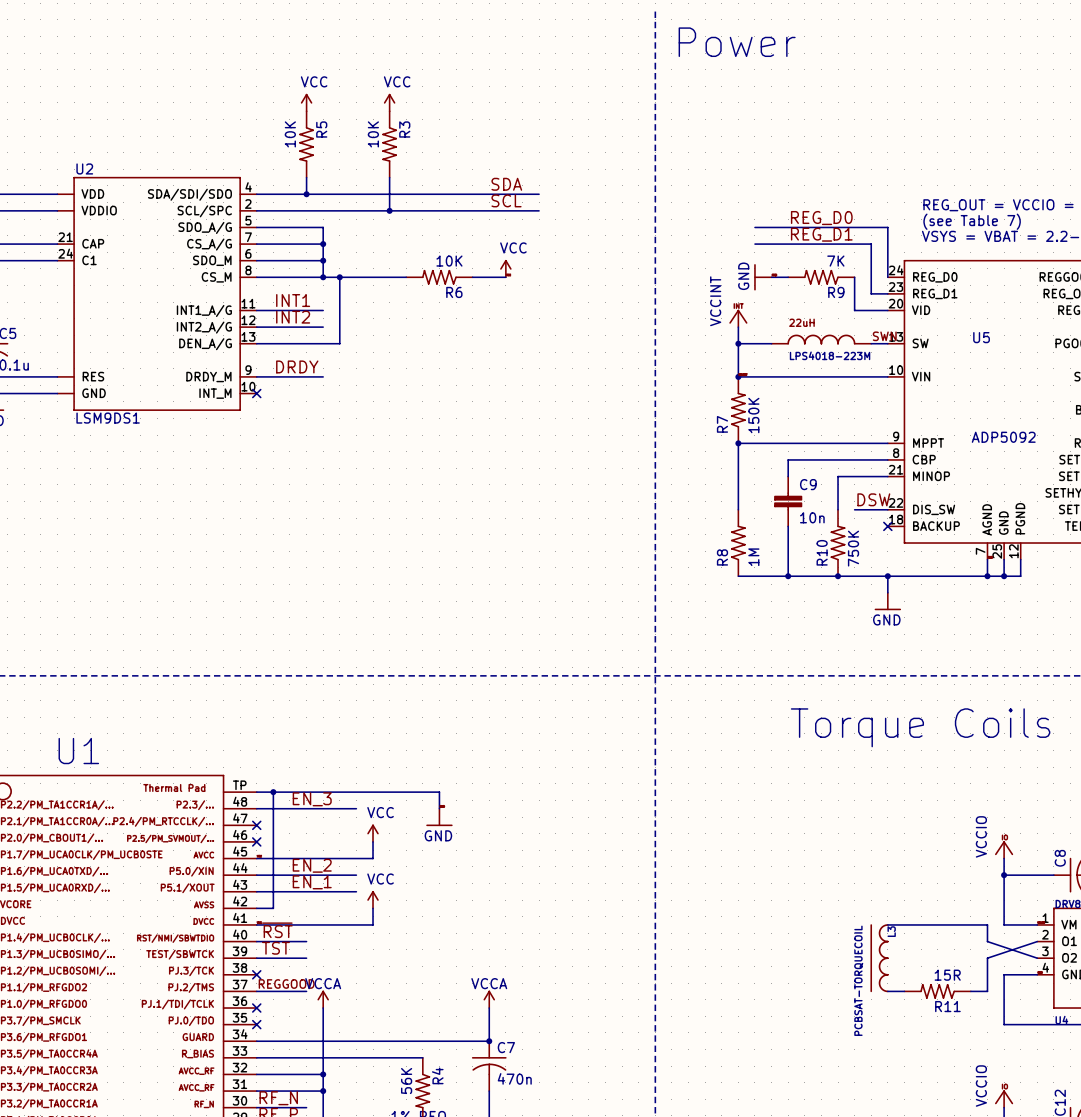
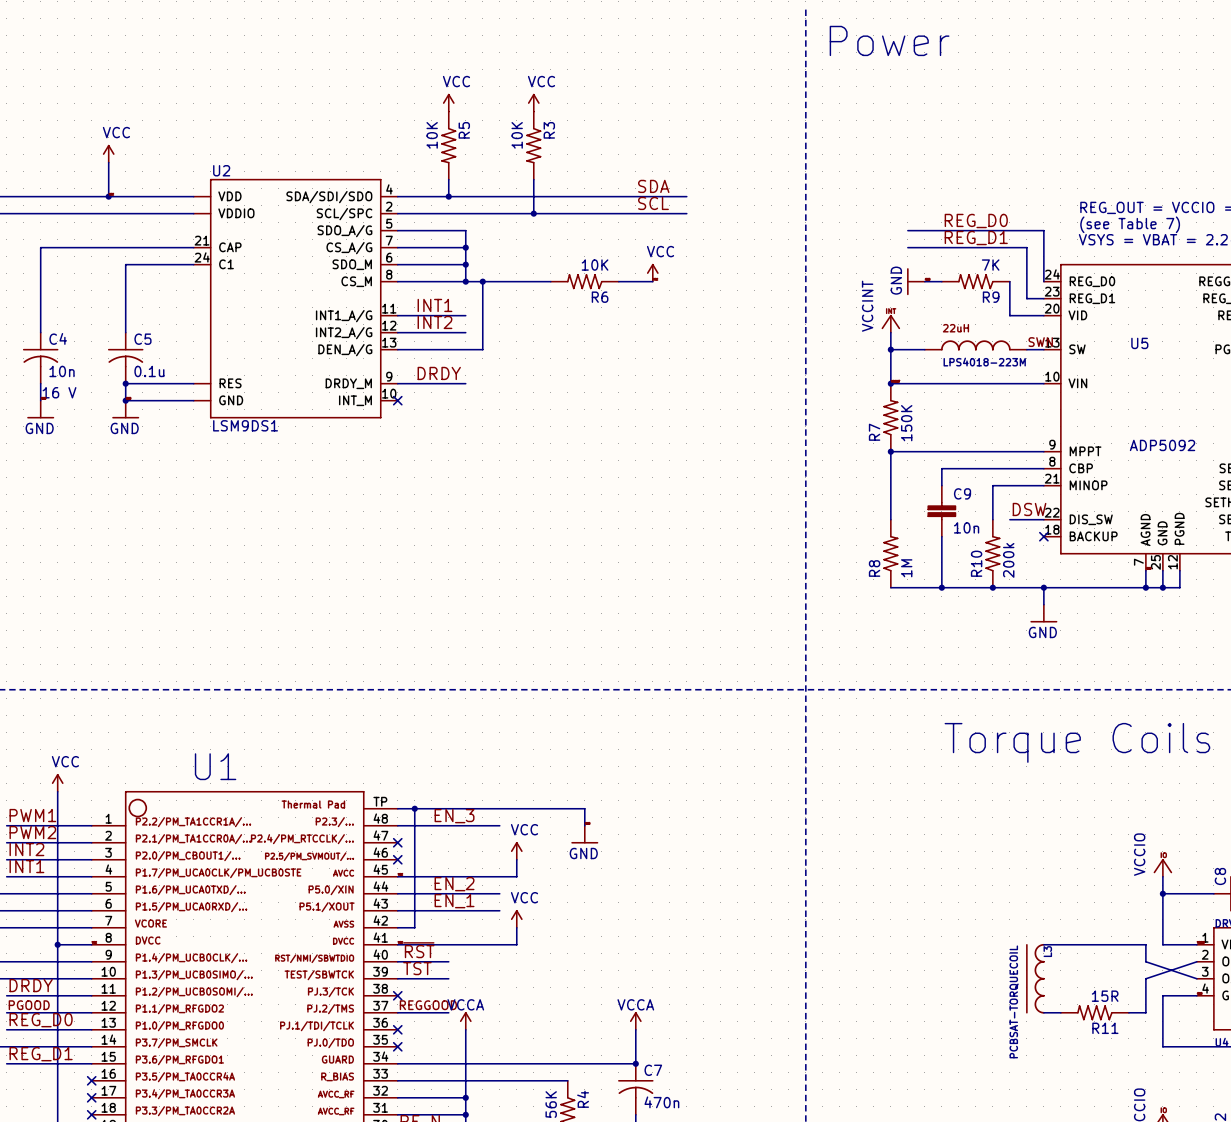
R10 value: 750K (853, 548) -> 200k (1008, 560)

